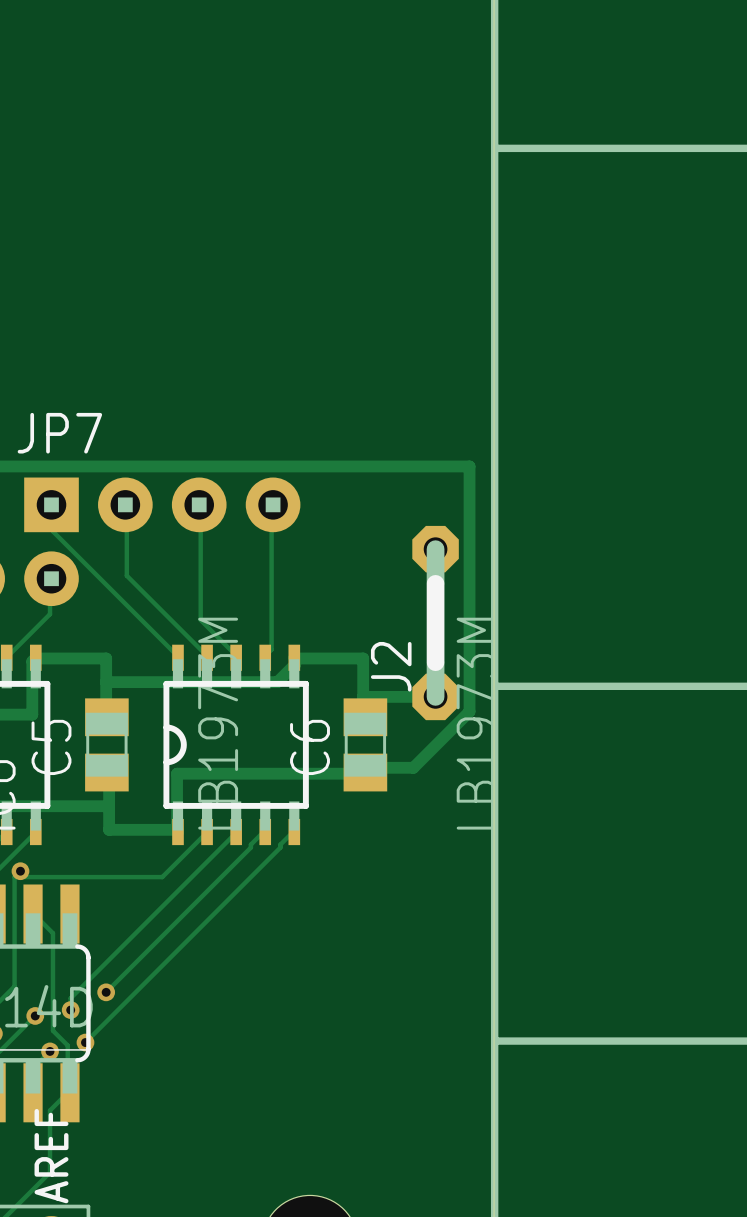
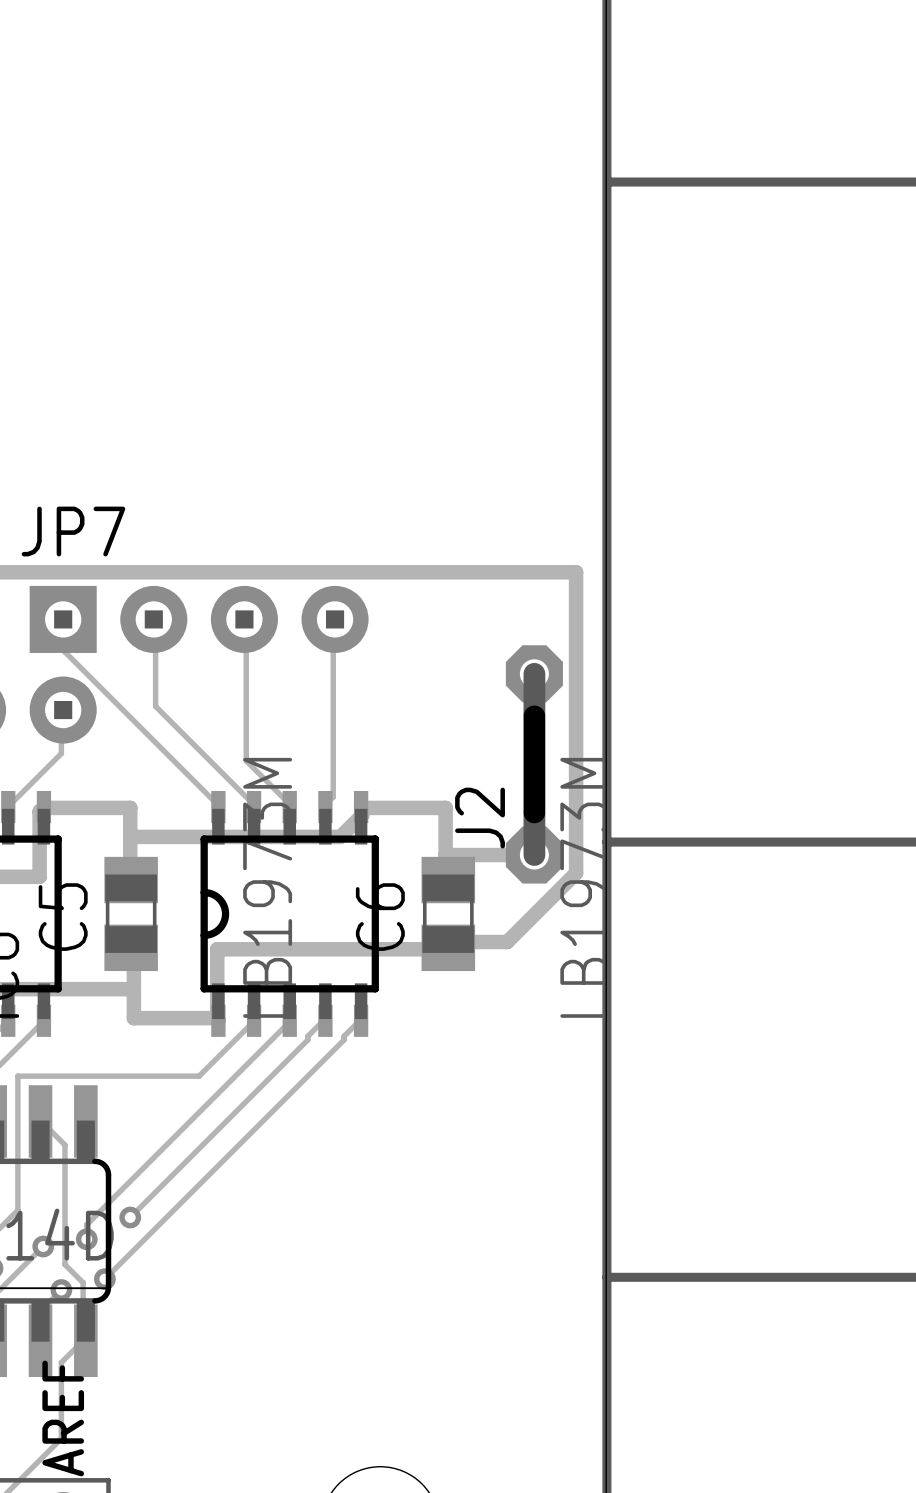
via: (20, 871) -> none

